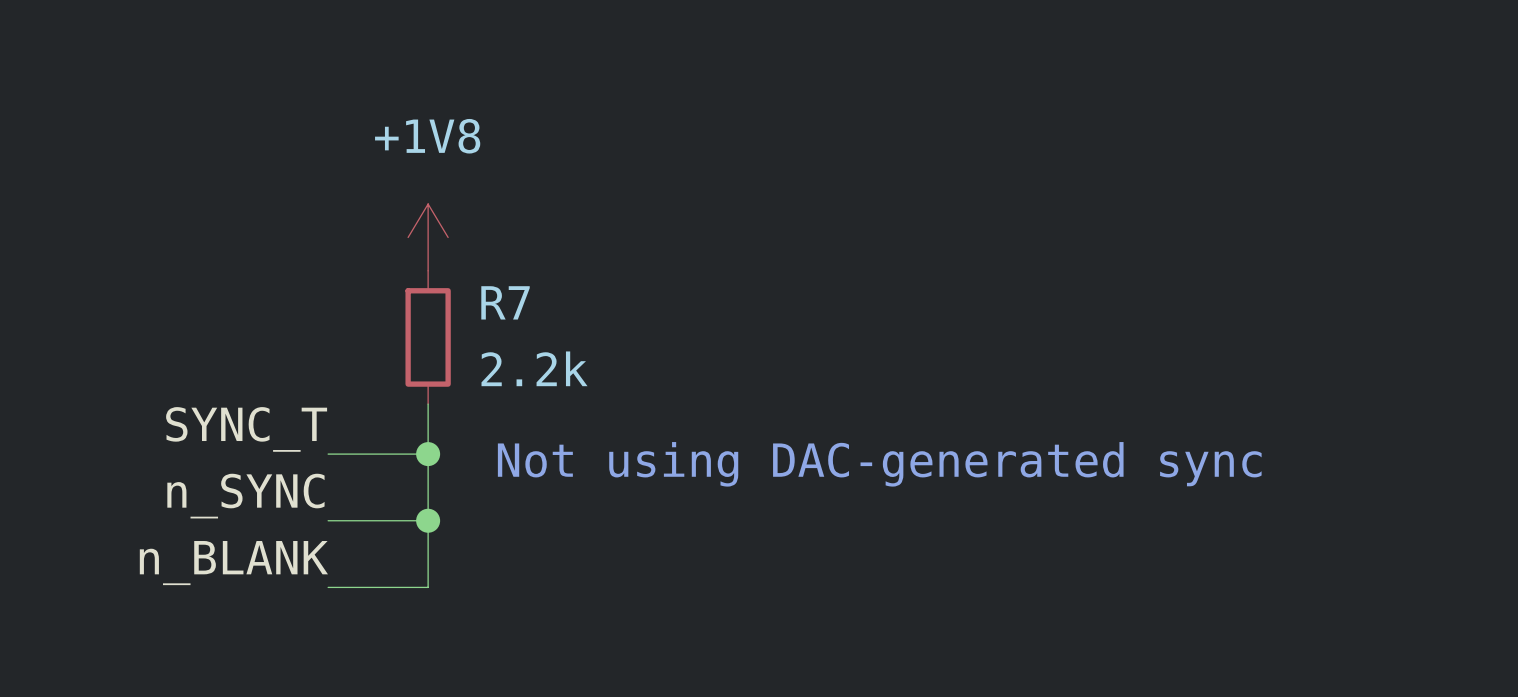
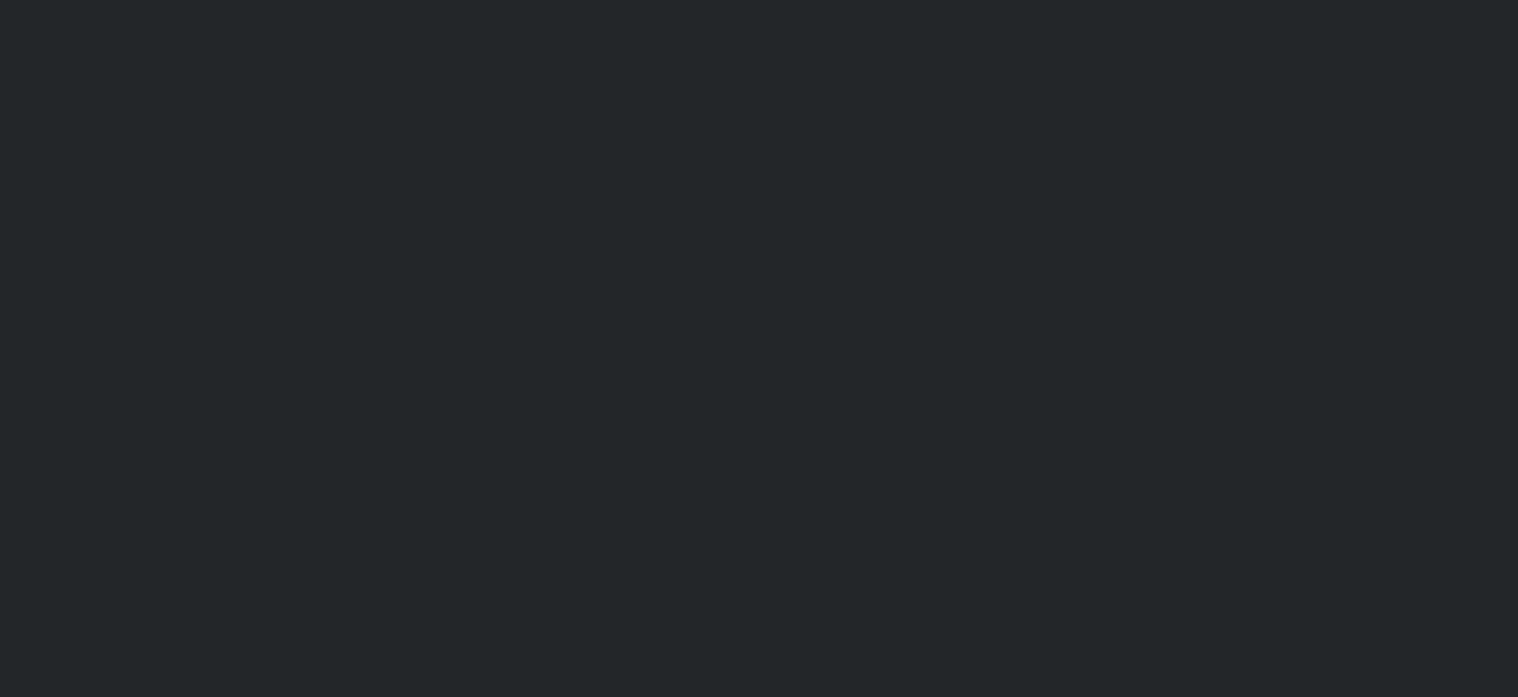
power symbol: +1V8 (428, 237) -> none
R7: 2.2k (428, 337) -> none
wire: (428, 404) (428, 587) (328, 587) -> none
label: SYNC_T (246, 429) -> none
wire: (328, 454) (428, 454) -> none
junction: (428, 454) -> none
text: Not using DAC-generated sync (879, 464) -> none
label: n_SYNC (245, 496) -> none
wire: (328, 520) (428, 520) -> none
junction: (428, 520) -> none
label: n_BLANK (233, 563) -> none

